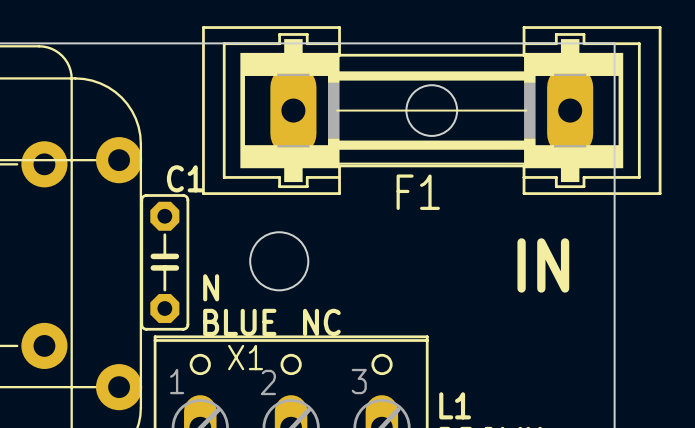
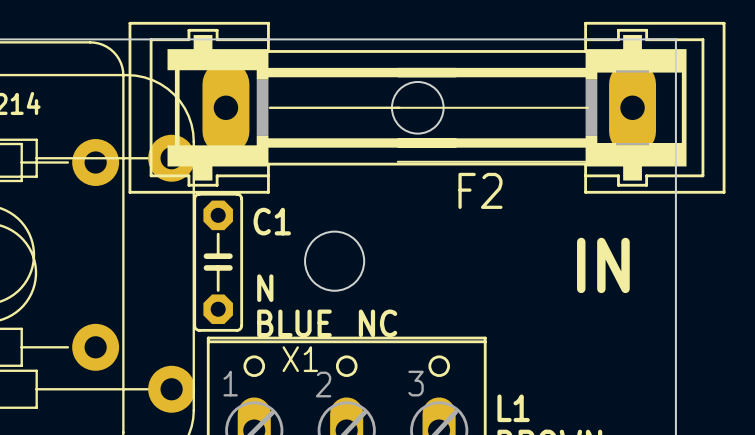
F2: none -> (427, 107)
F1: (431, 110) -> none
C1 name position: C1 (185, 178) -> C1 (272, 221)

